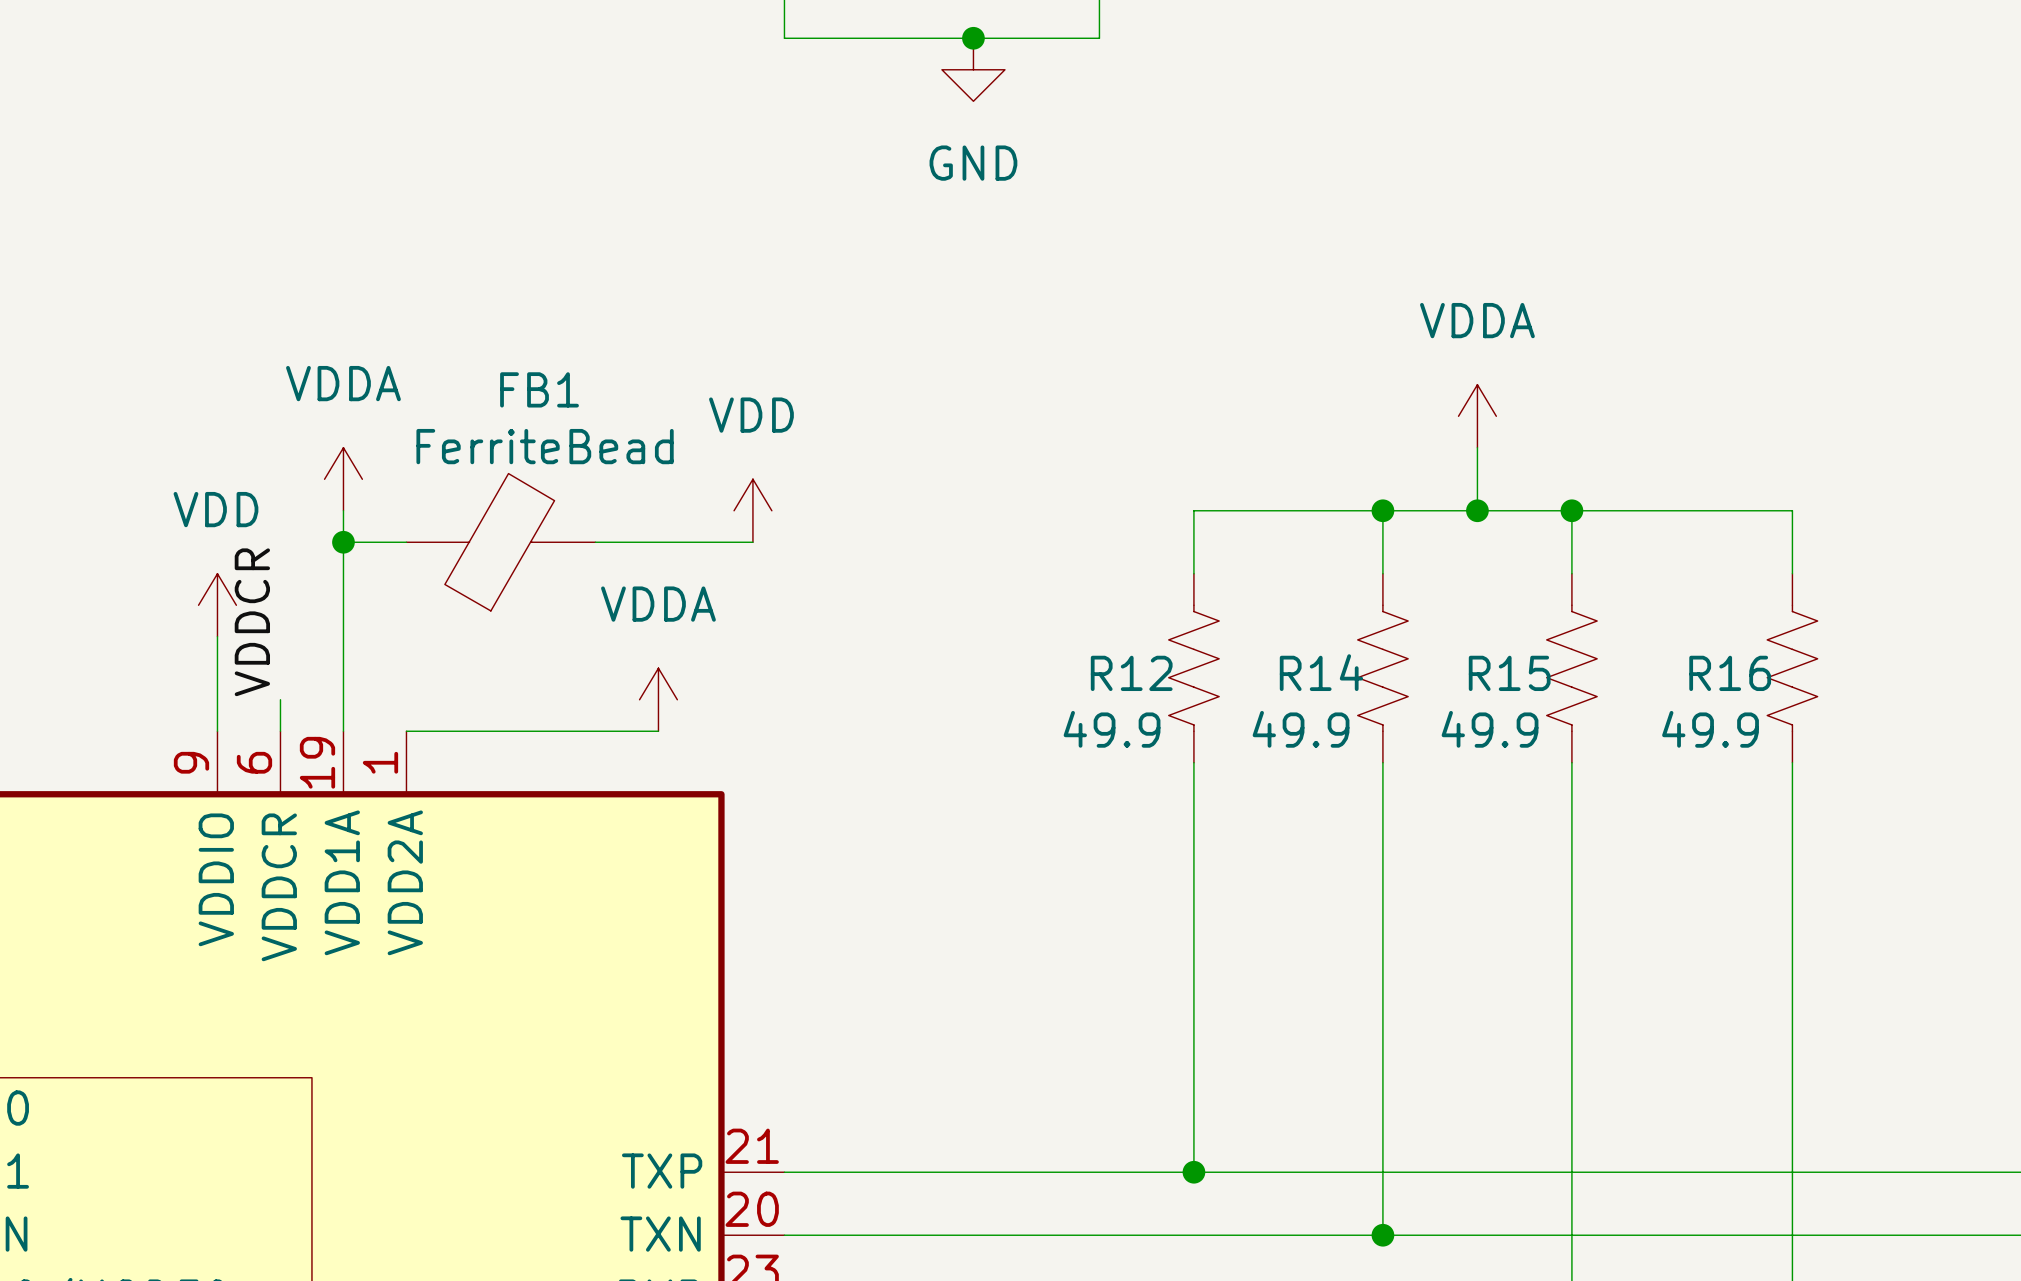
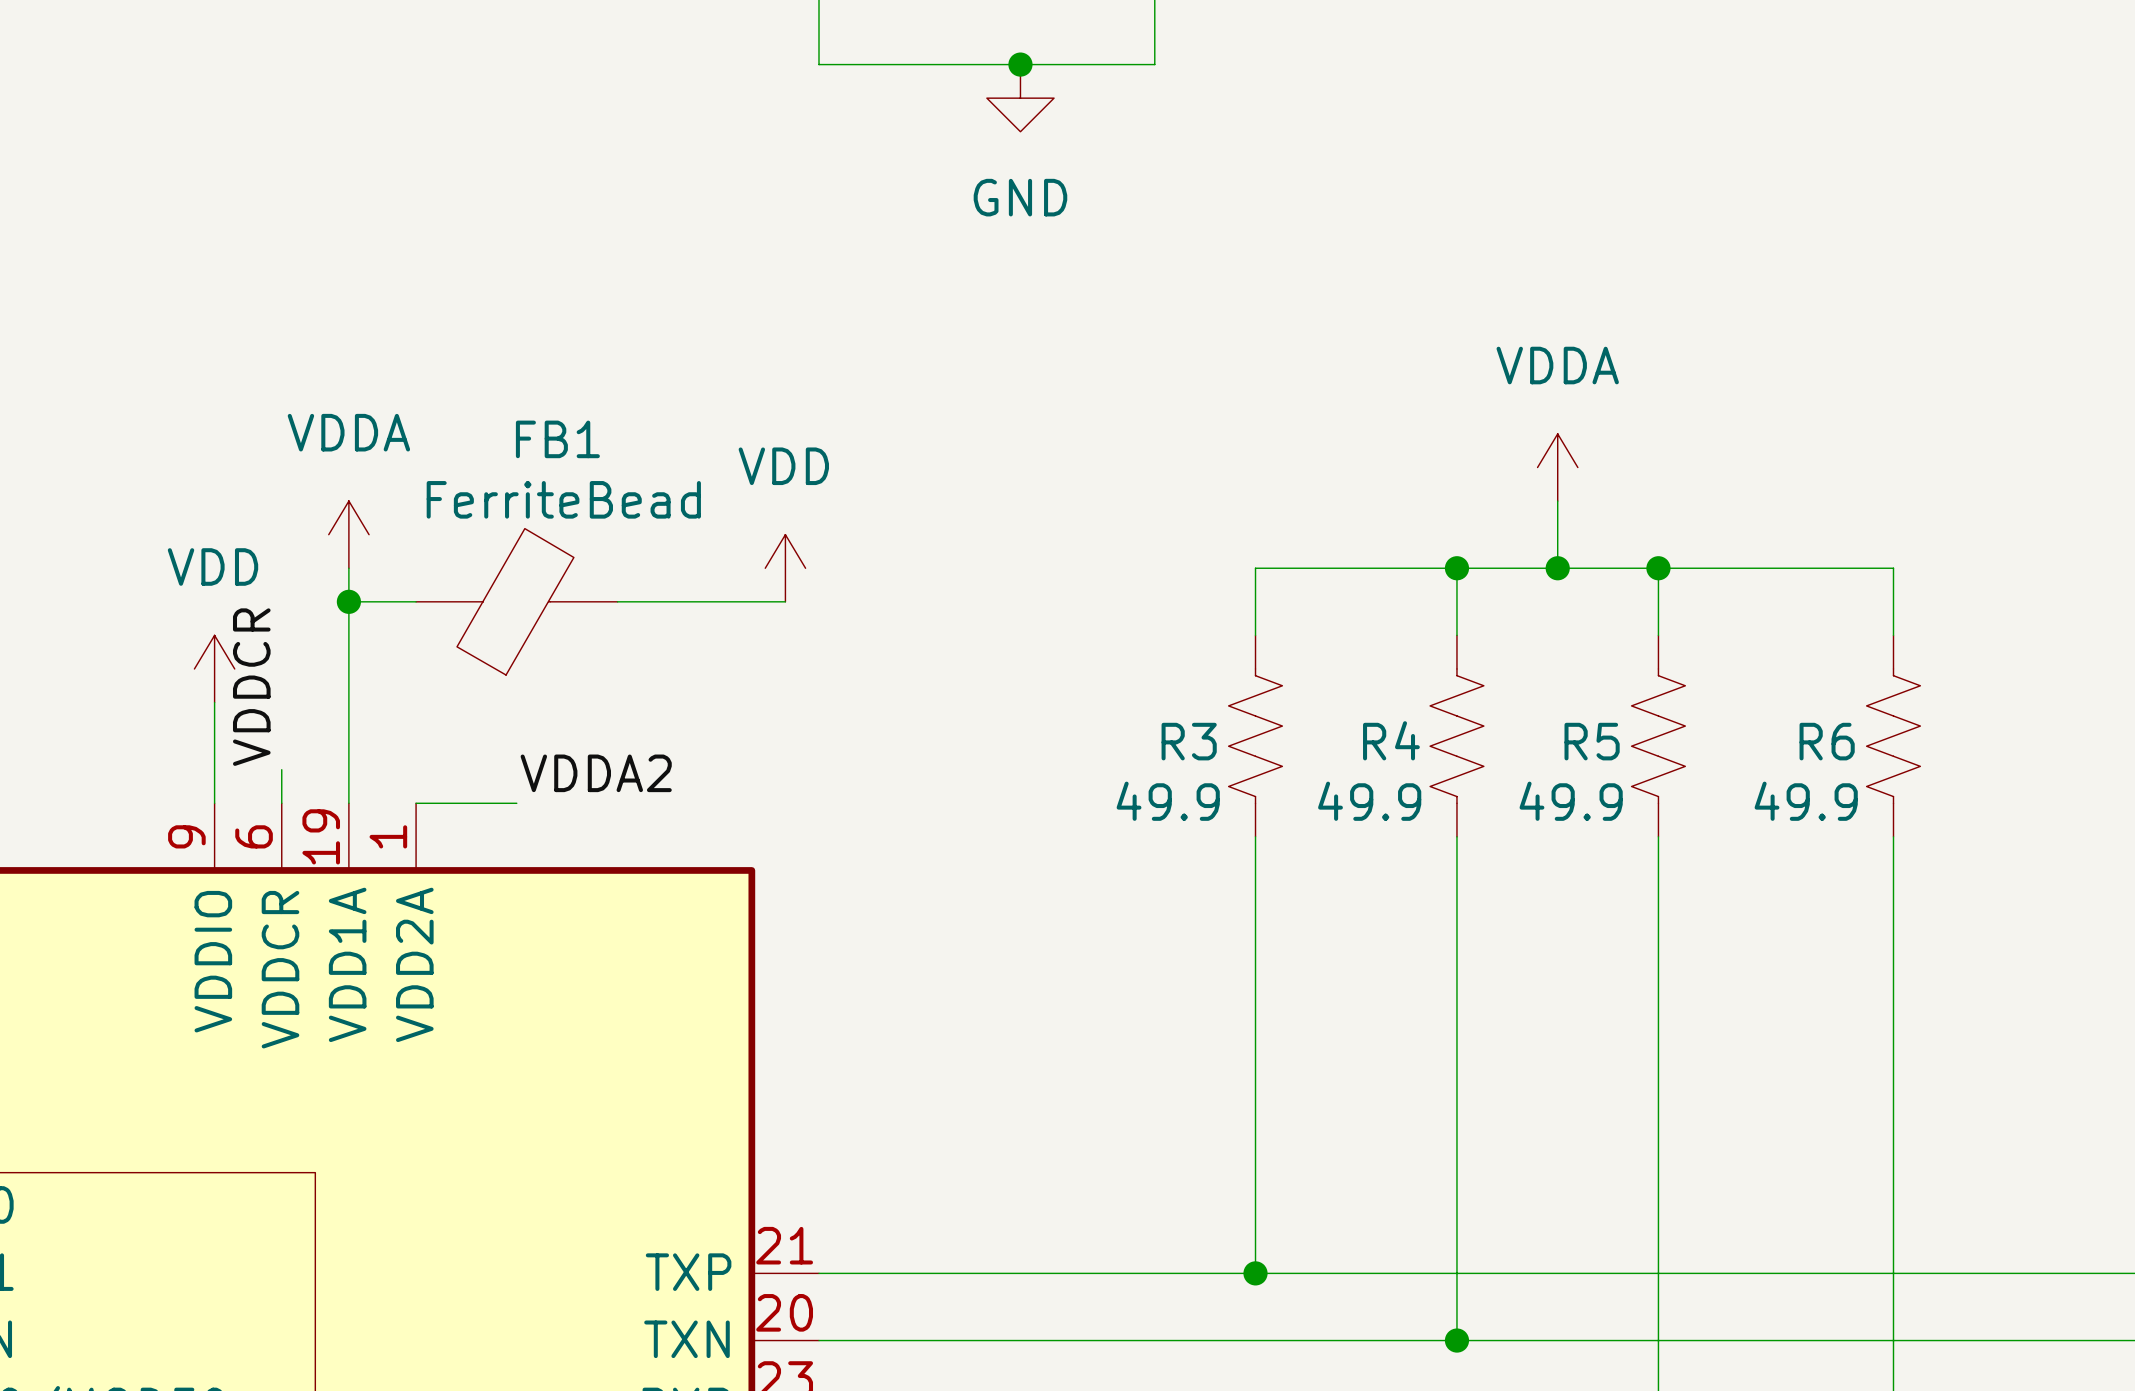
R14 name: R14 (1321, 672) -> R4 (1391, 740)
R12 name: R12 (1131, 673) -> R3 (1189, 741)
R15 name: R15 (1509, 673) -> R5 (1592, 741)
R16 name: R16 (1730, 673) -> R6 (1827, 741)
power symbol: VDDA (658, 699) -> none
label: none -> VDDA2 (596, 773)
wire: (500, 731) (658, 731) -> none

